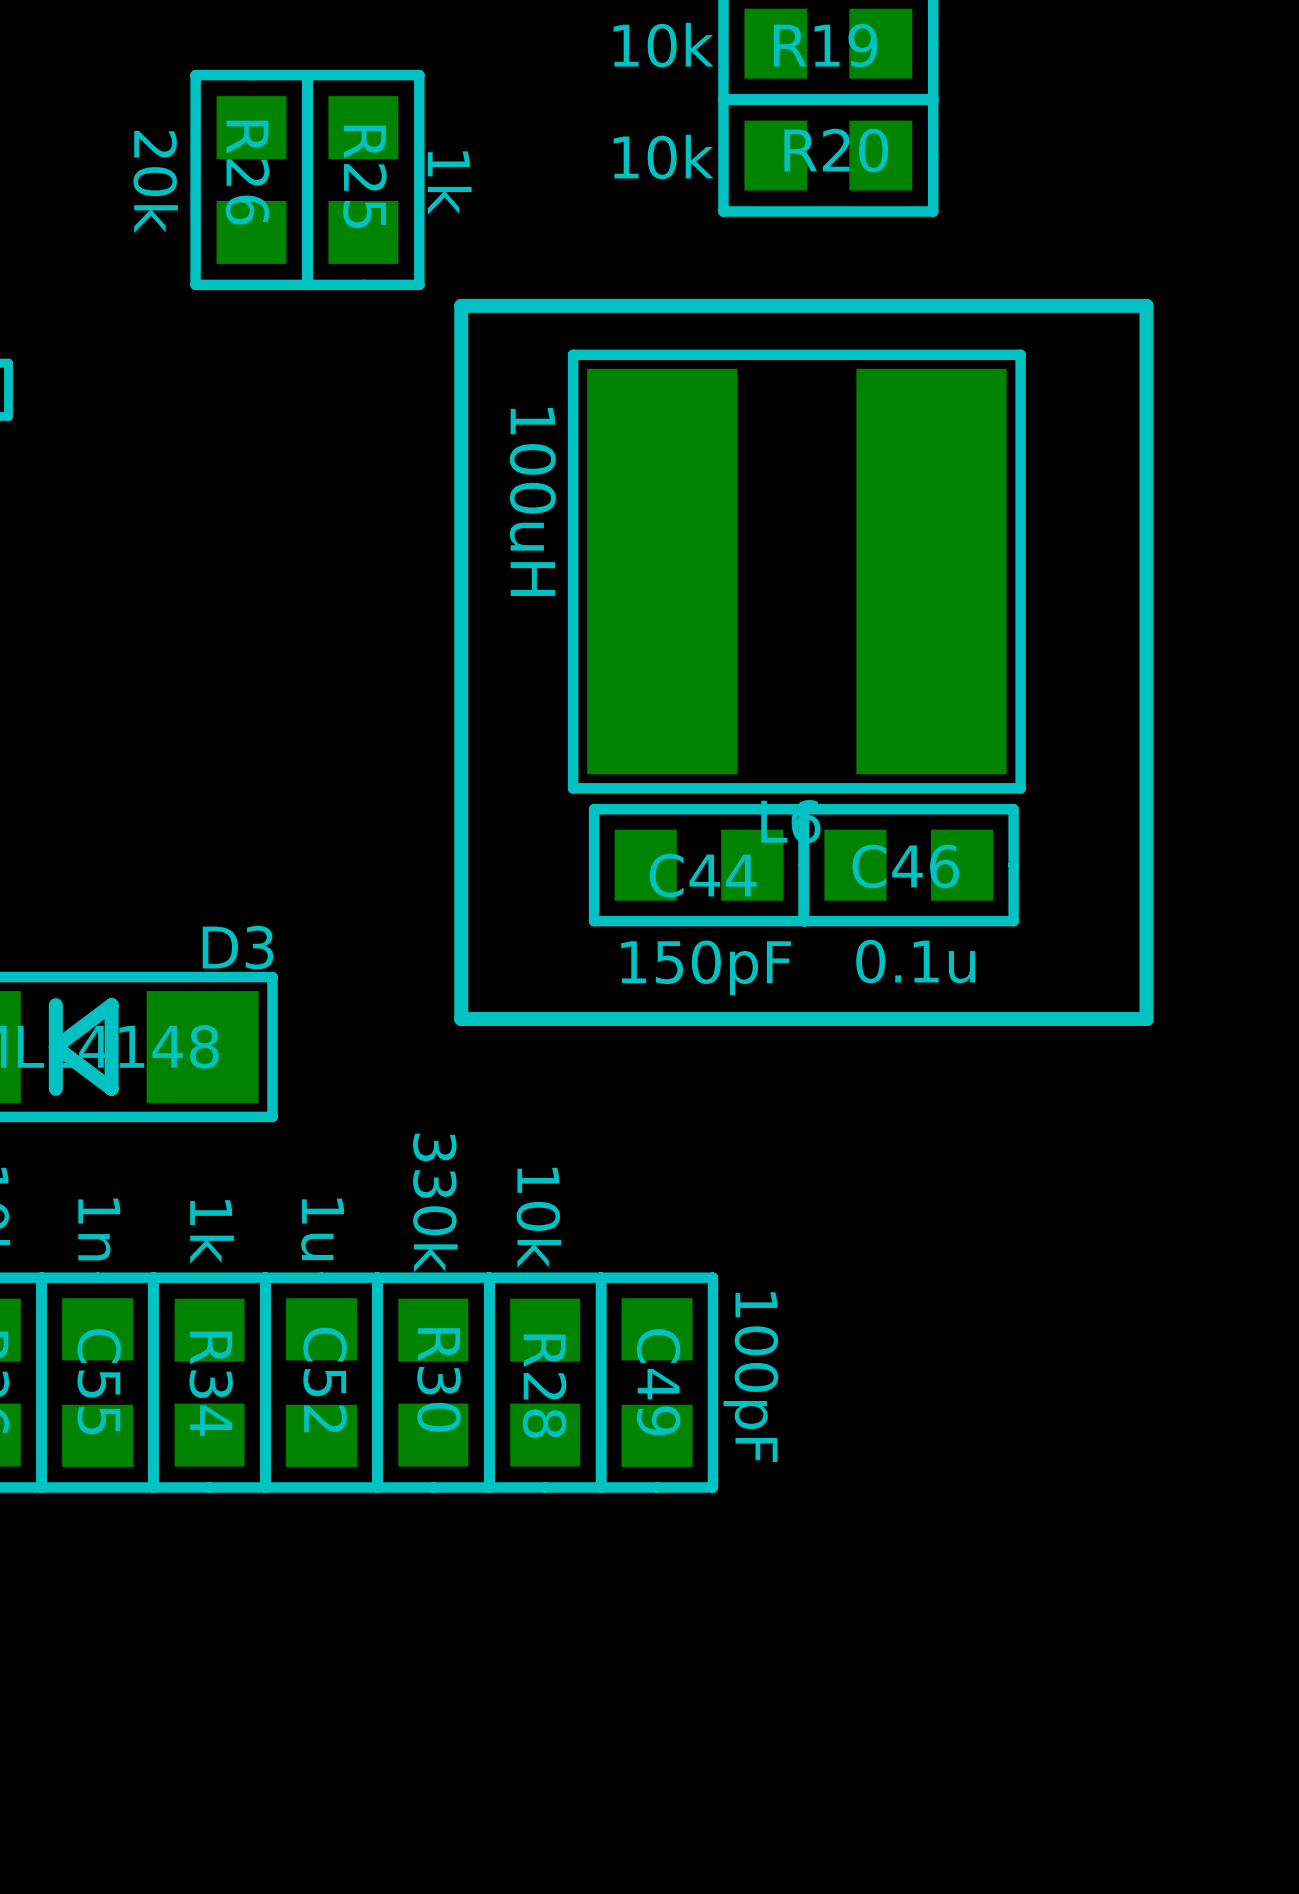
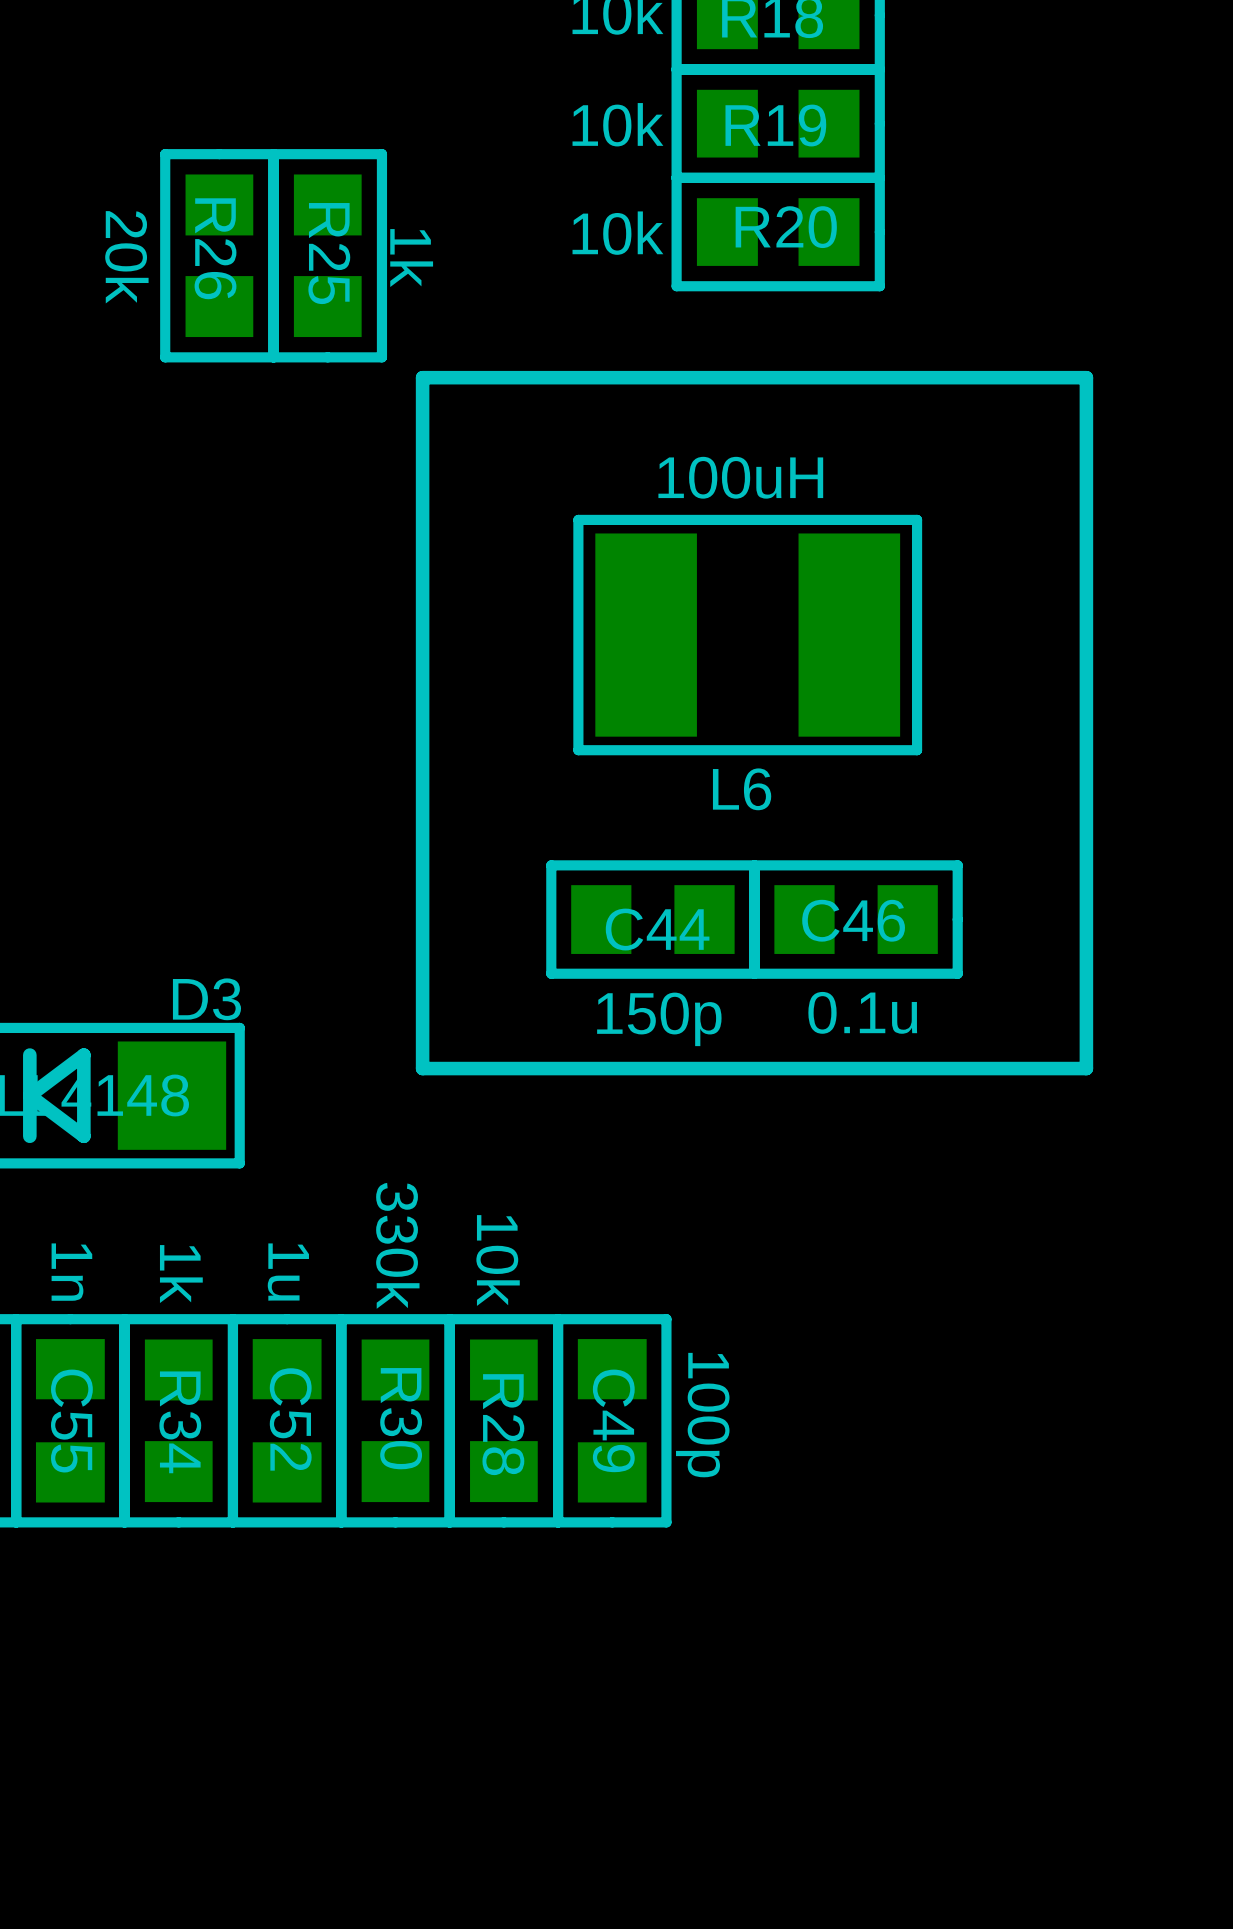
L6 footprint: [567, 349, 1026, 794] -> [573, 514, 923, 756]
L6 value position: 100uH (532, 501) -> 100uH (740, 477)
C44 value: 150pF (706, 967) -> 150p (659, 1019)
C49 value: 100pF (750, 1377) -> 100p (702, 1415)

